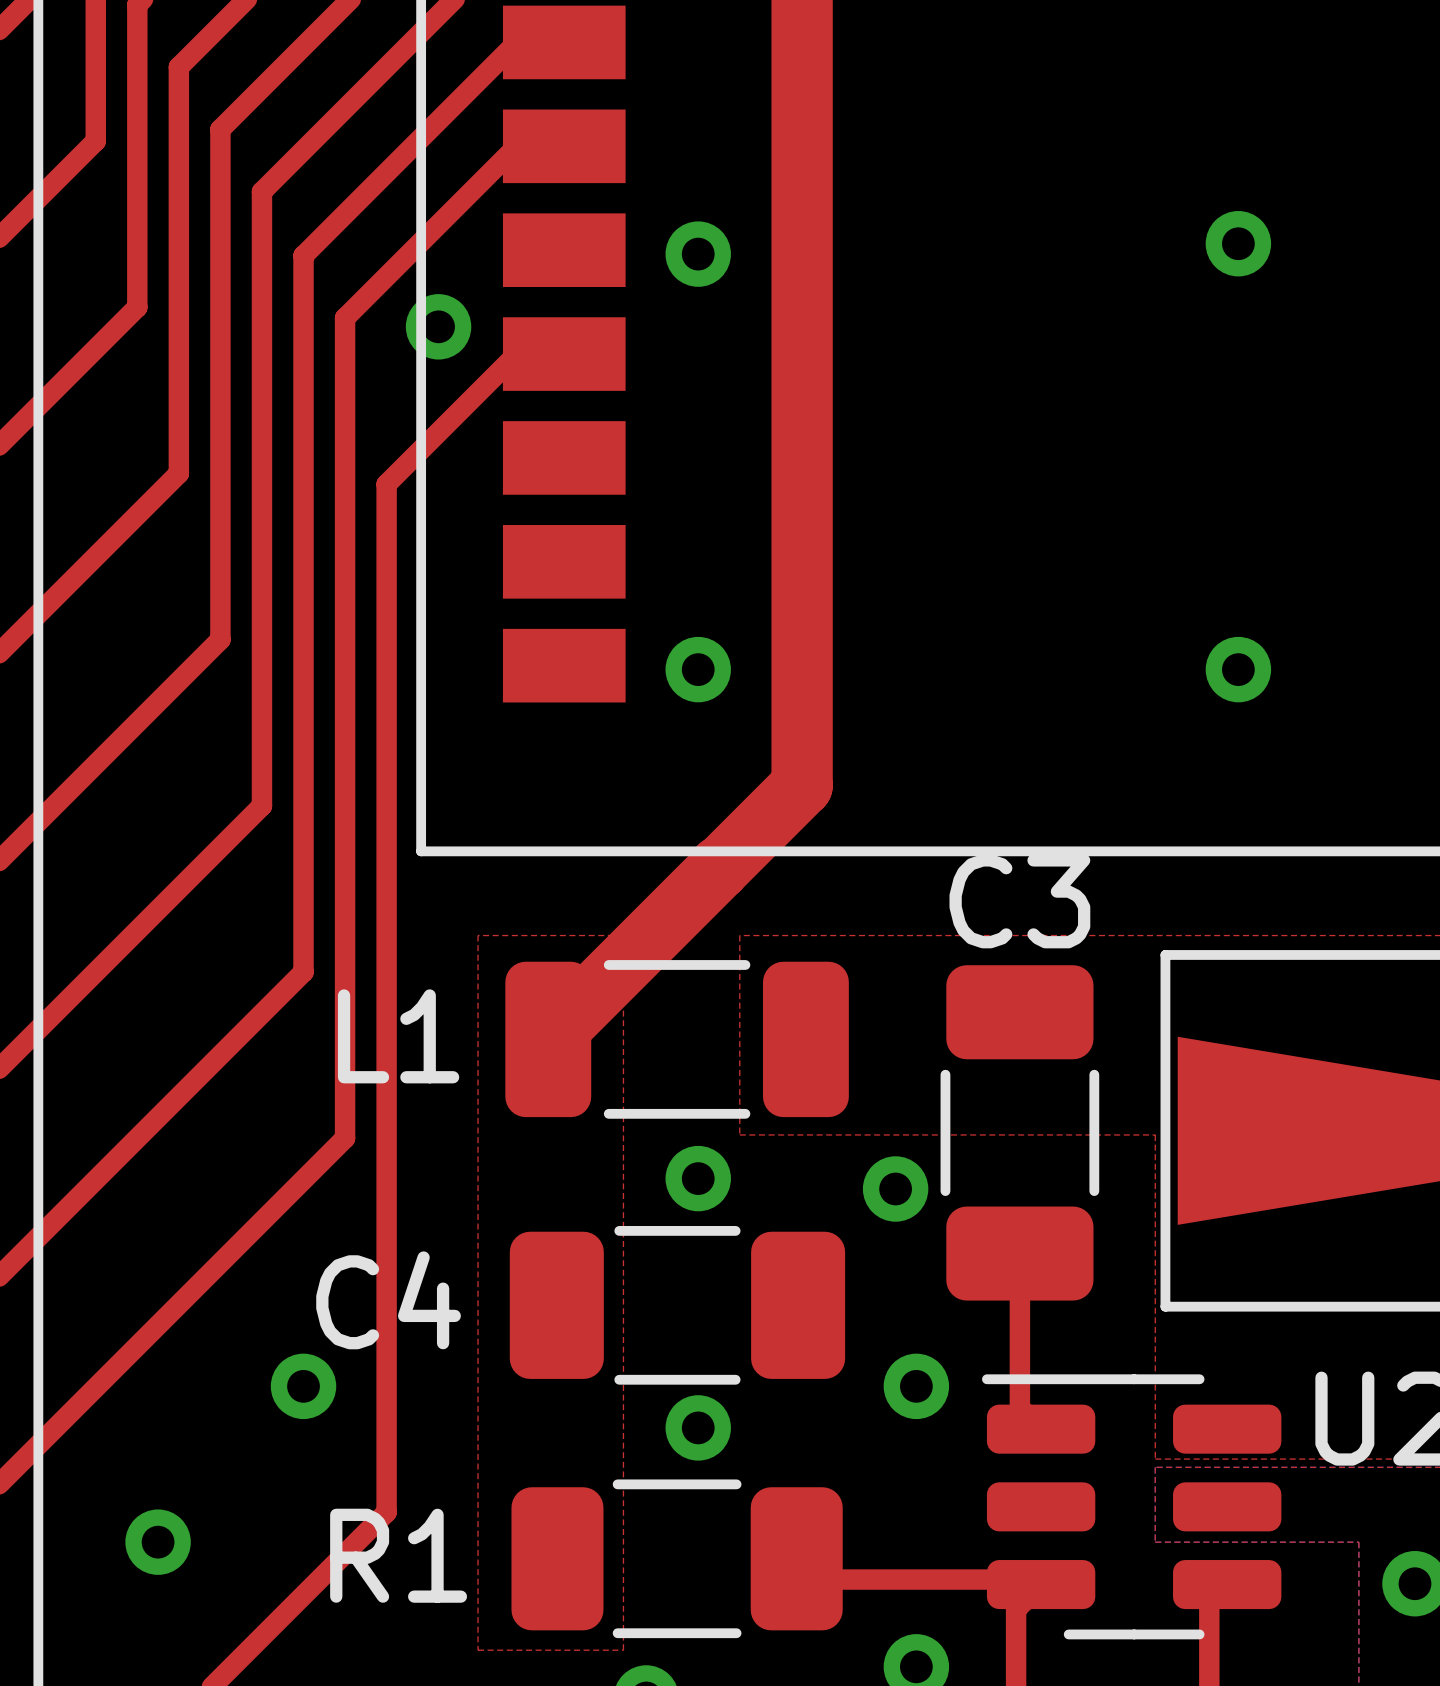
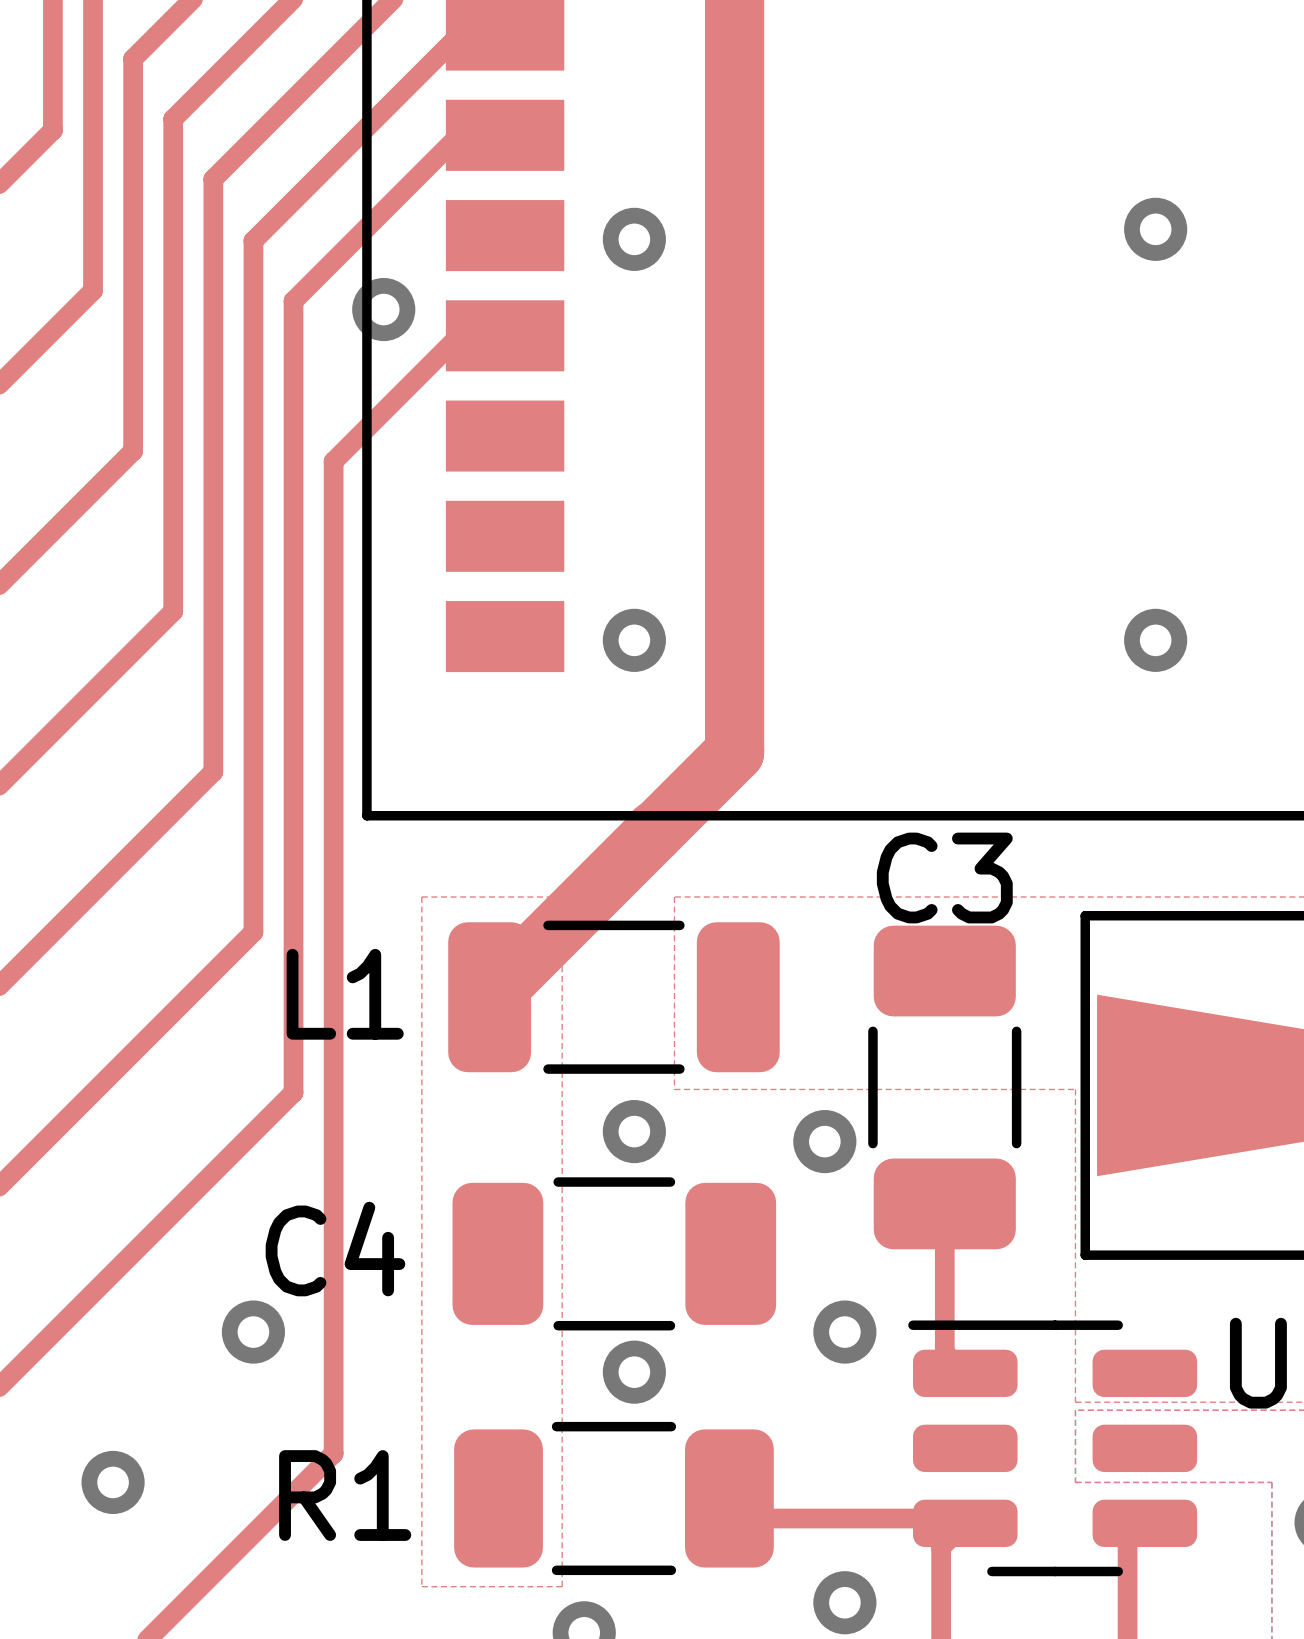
C3 name position: C3 (1019, 901) -> C3 (944, 878)

